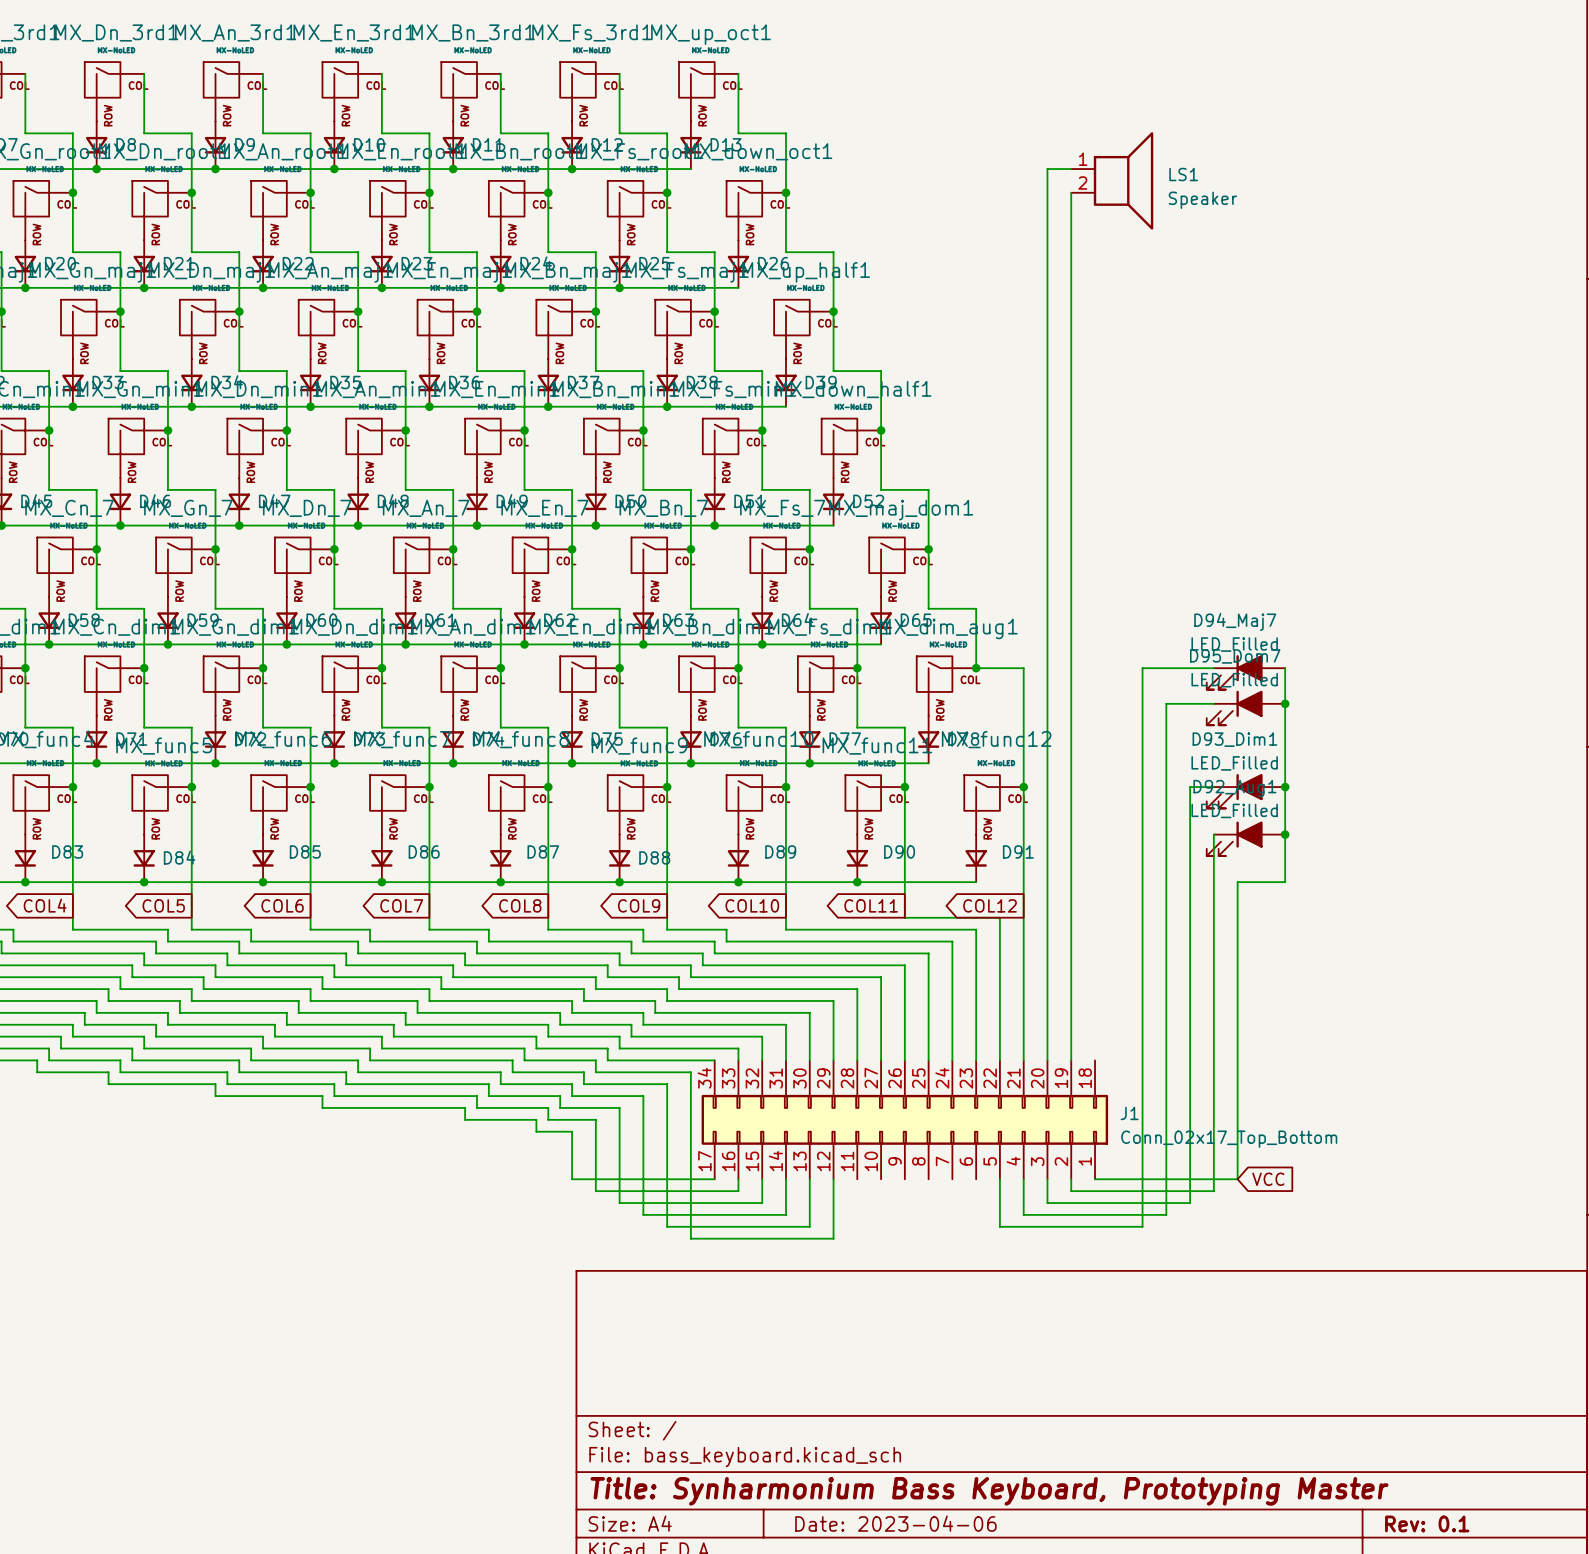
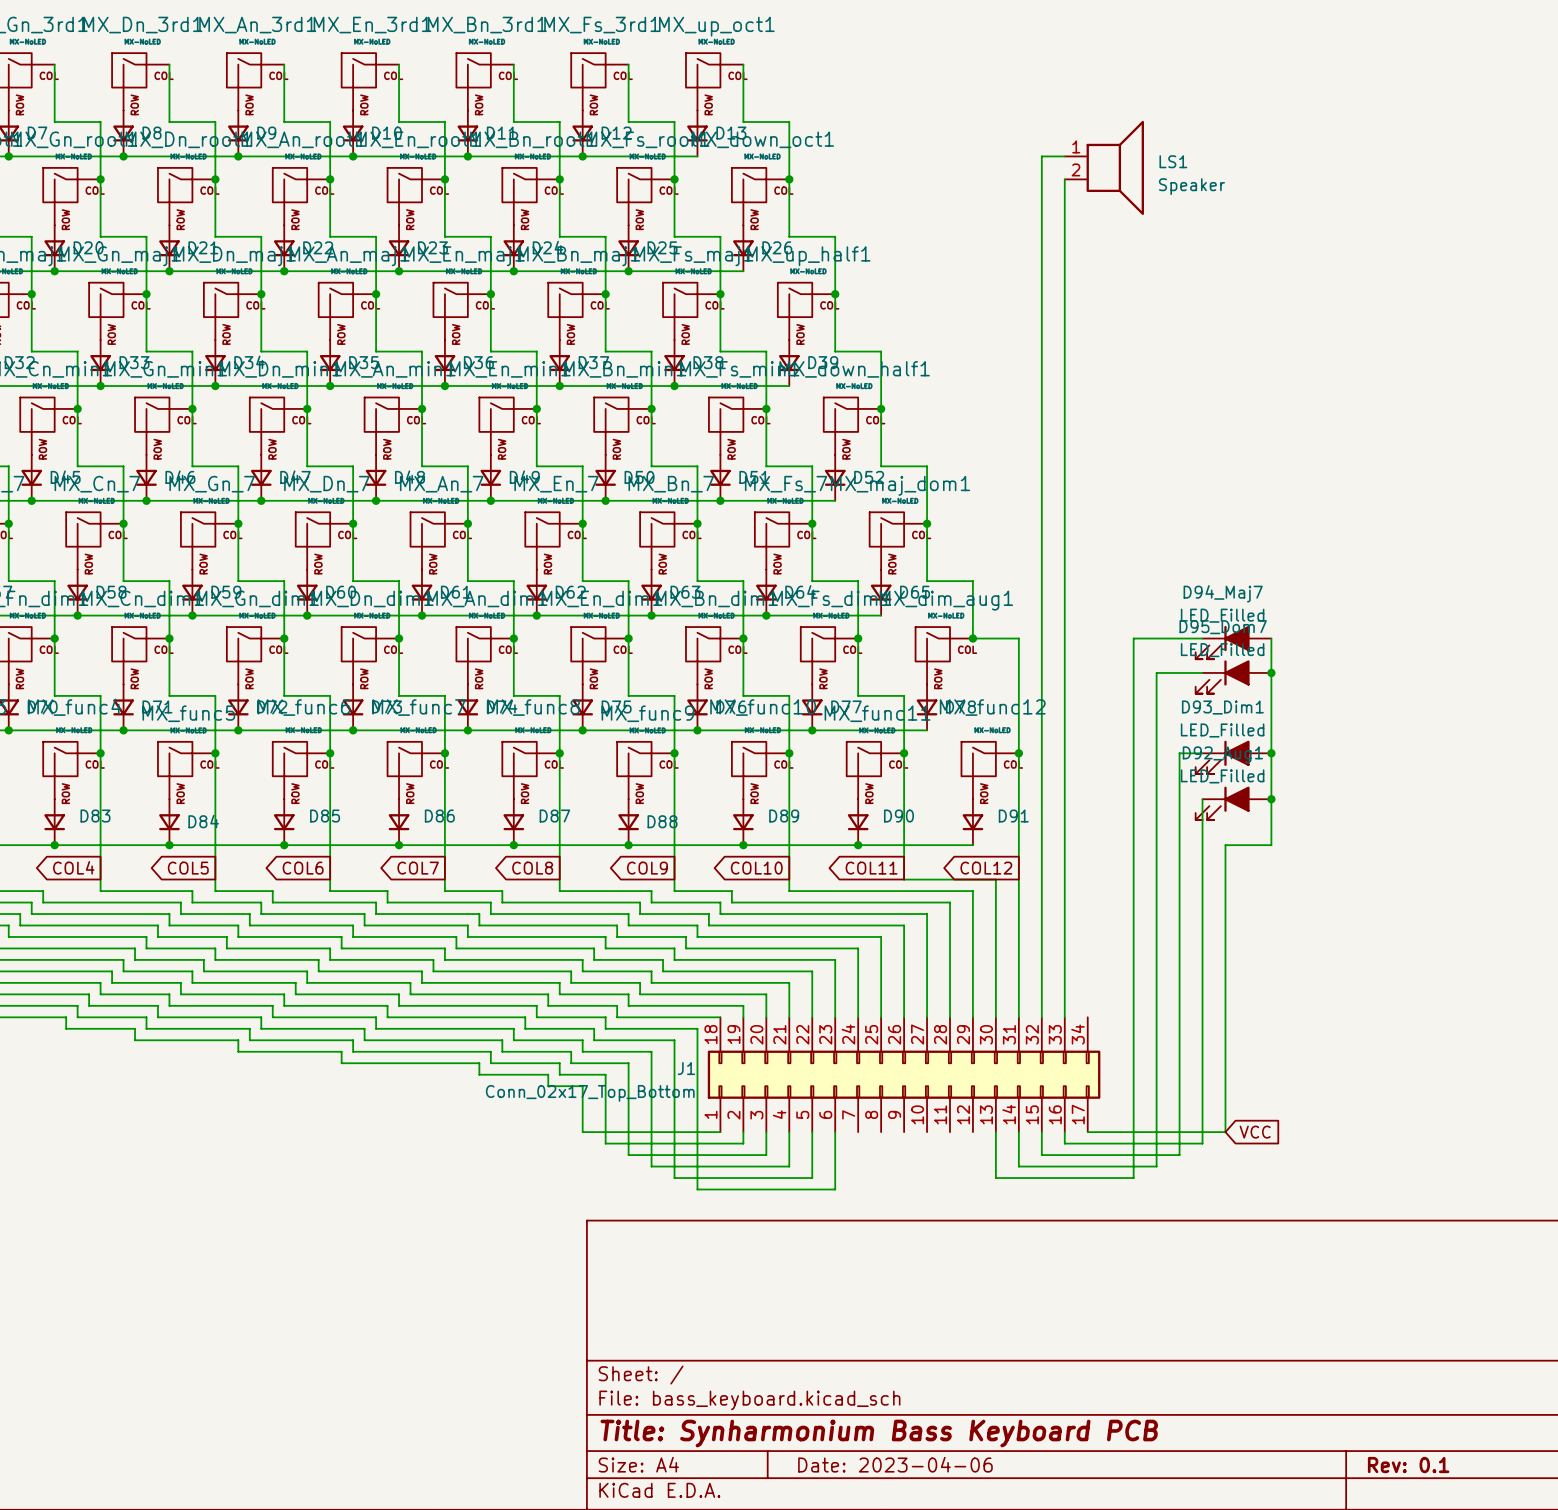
J1 flip: as is (904, 1119) -> left-right (904, 1074)
title block: Title: Synharmonium Bass Keyboard, Prototyping Master (989, 1491) -> Title: Synharmonium Bass Keyboard PCB (879, 1433)

